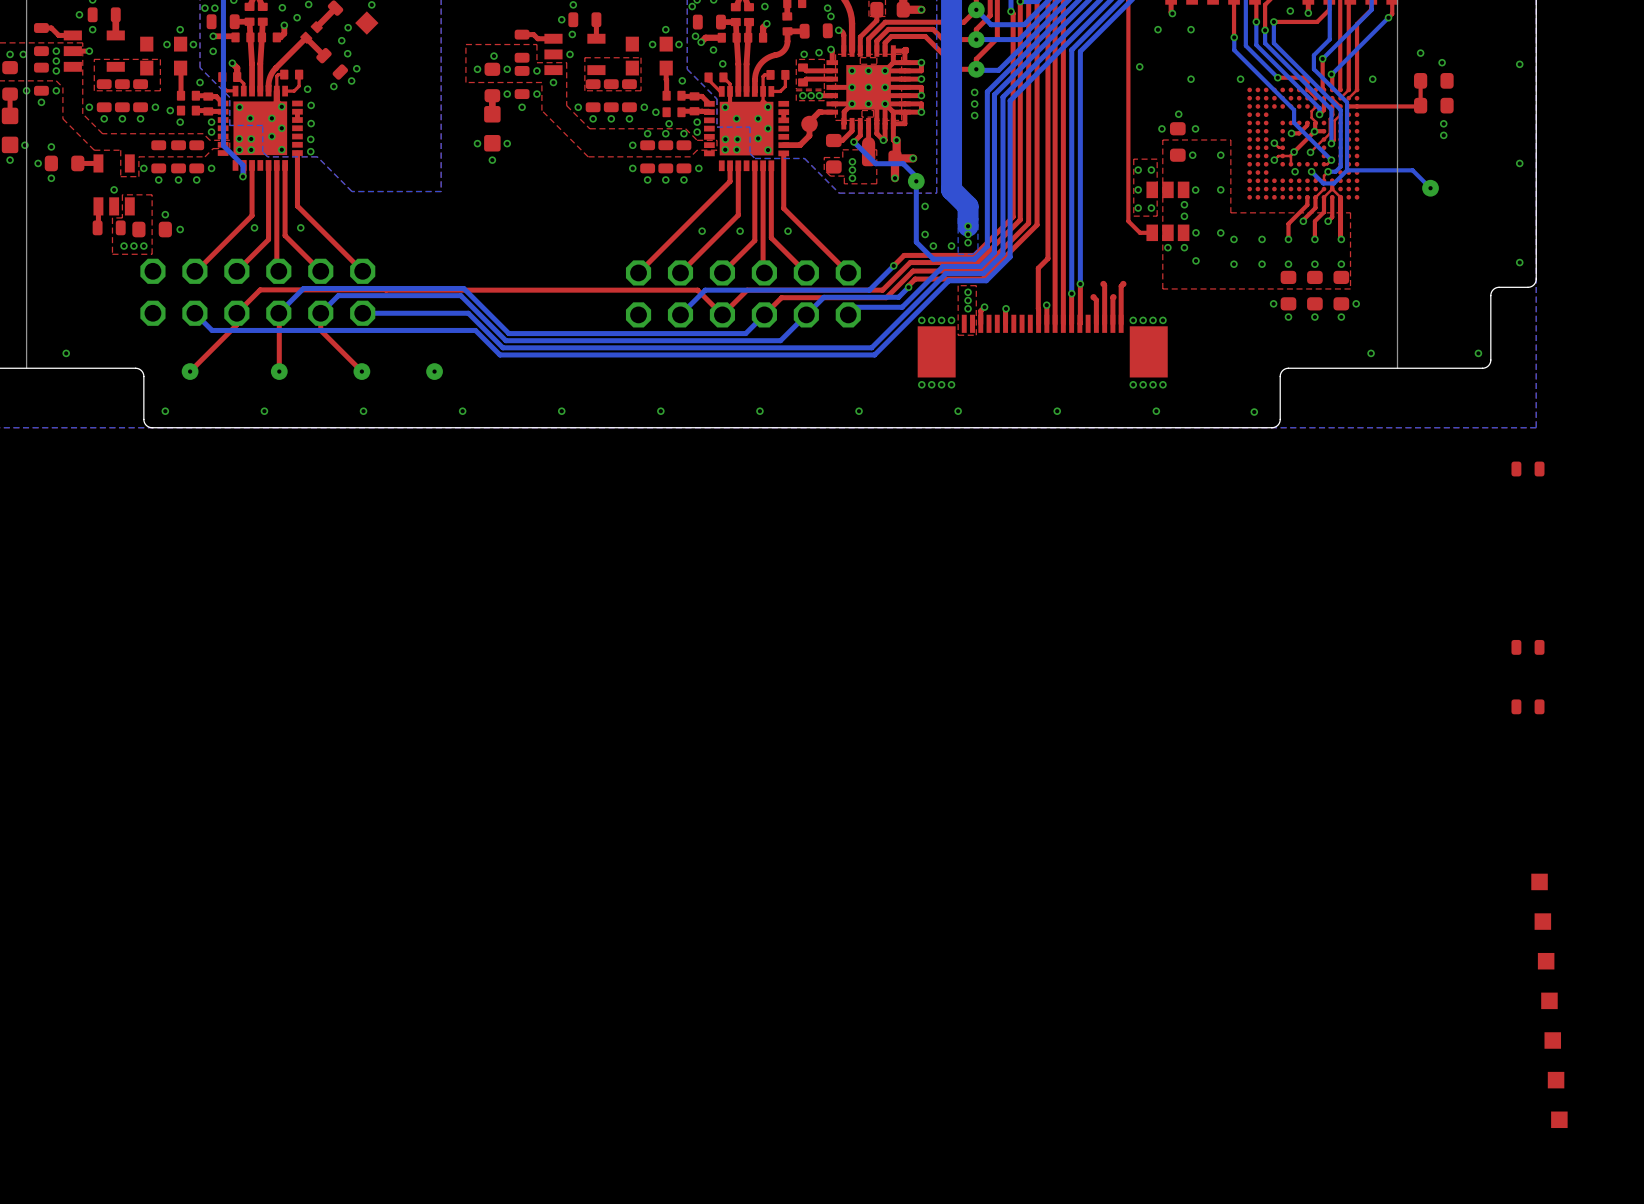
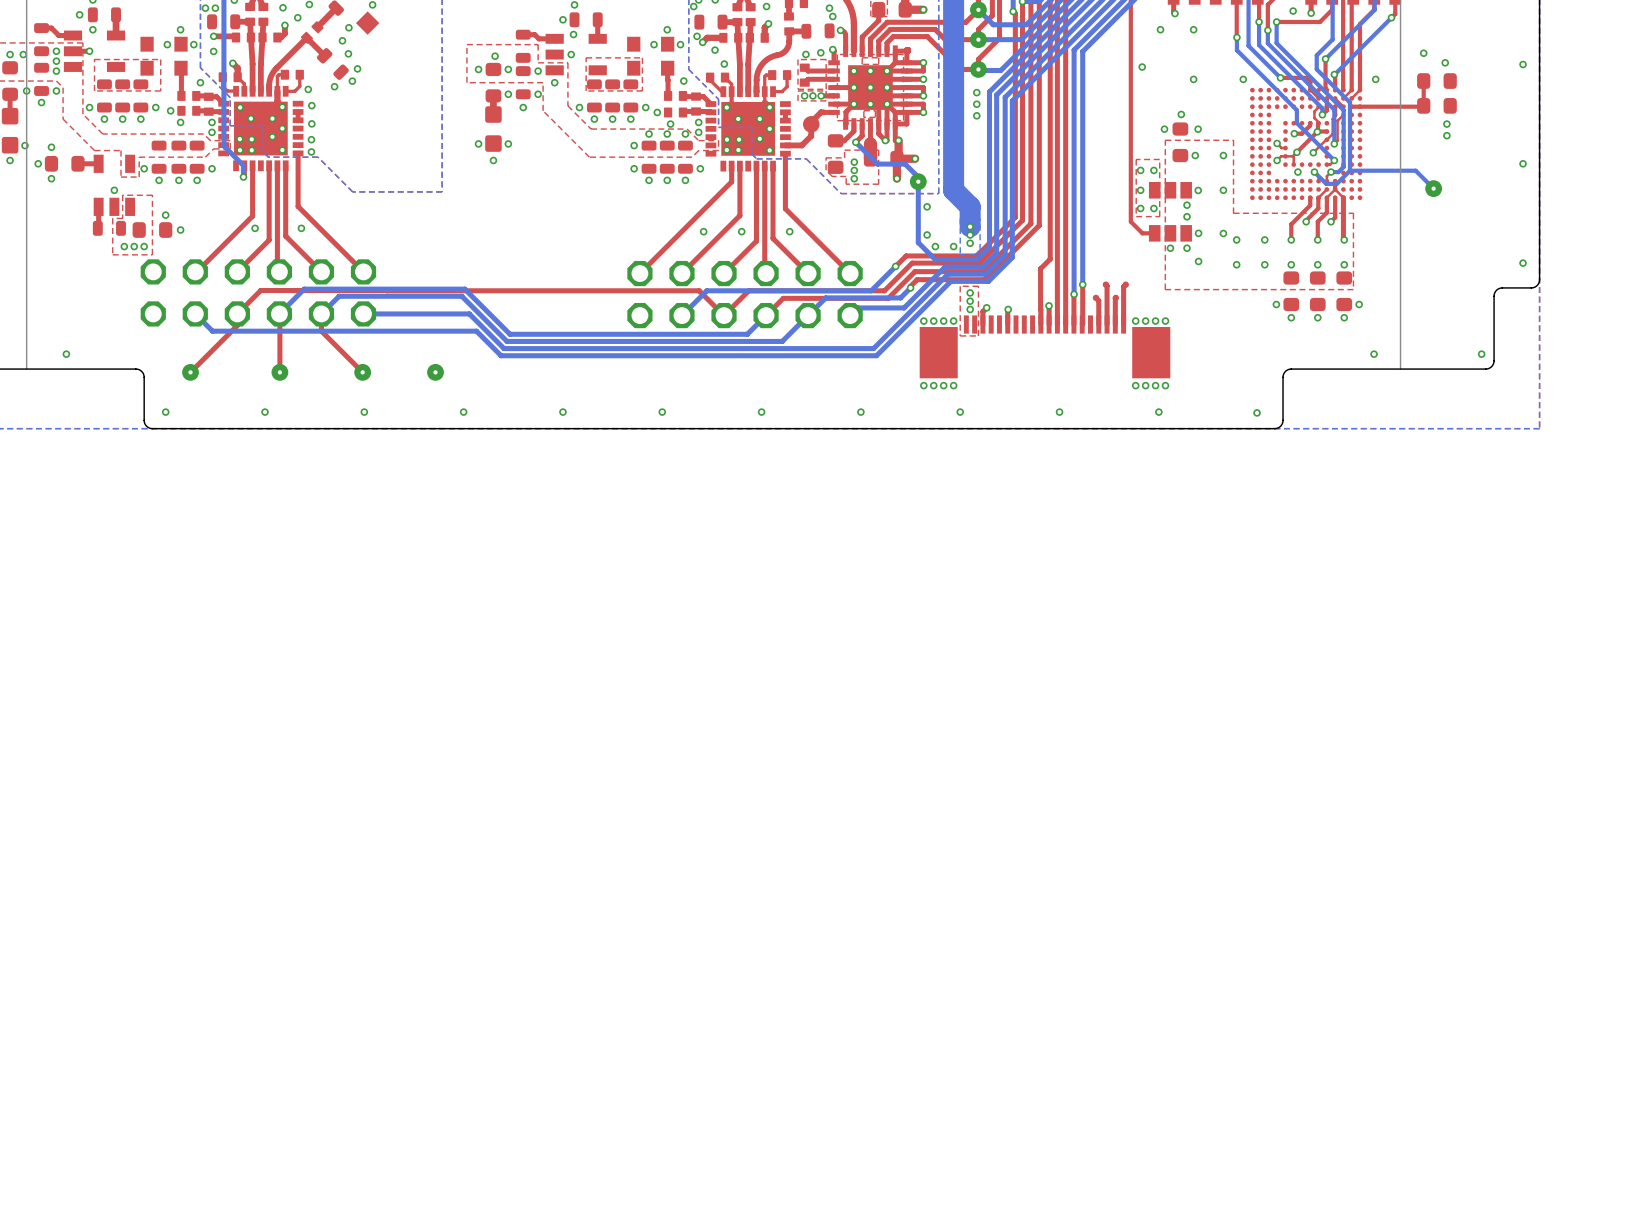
part: (1527, 469) -> none
part: (1527, 647) -> none
part: (1527, 706) -> none
part: (1539, 881) -> none
part: (1542, 921) -> none
part: (1546, 961) -> none
part: (1549, 1000) -> none
part: (1552, 1040) -> none
part: (1556, 1080) -> none
part: (1559, 1119) -> none

